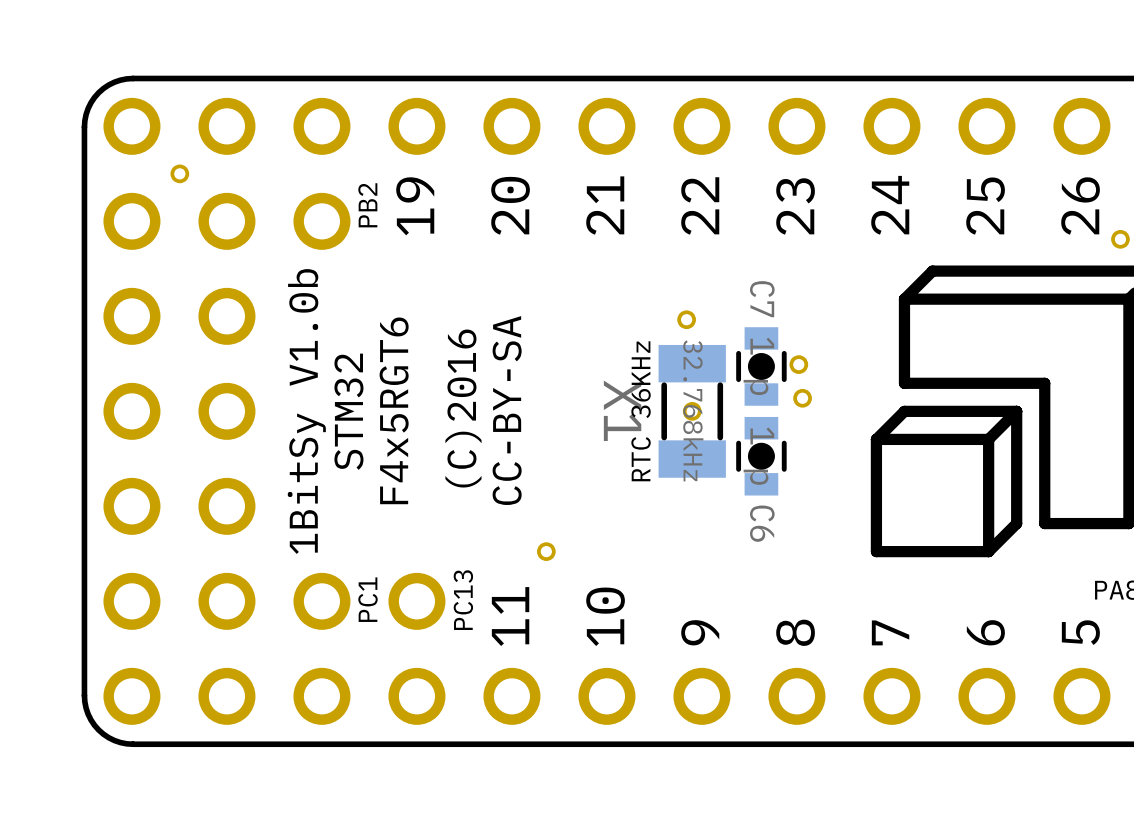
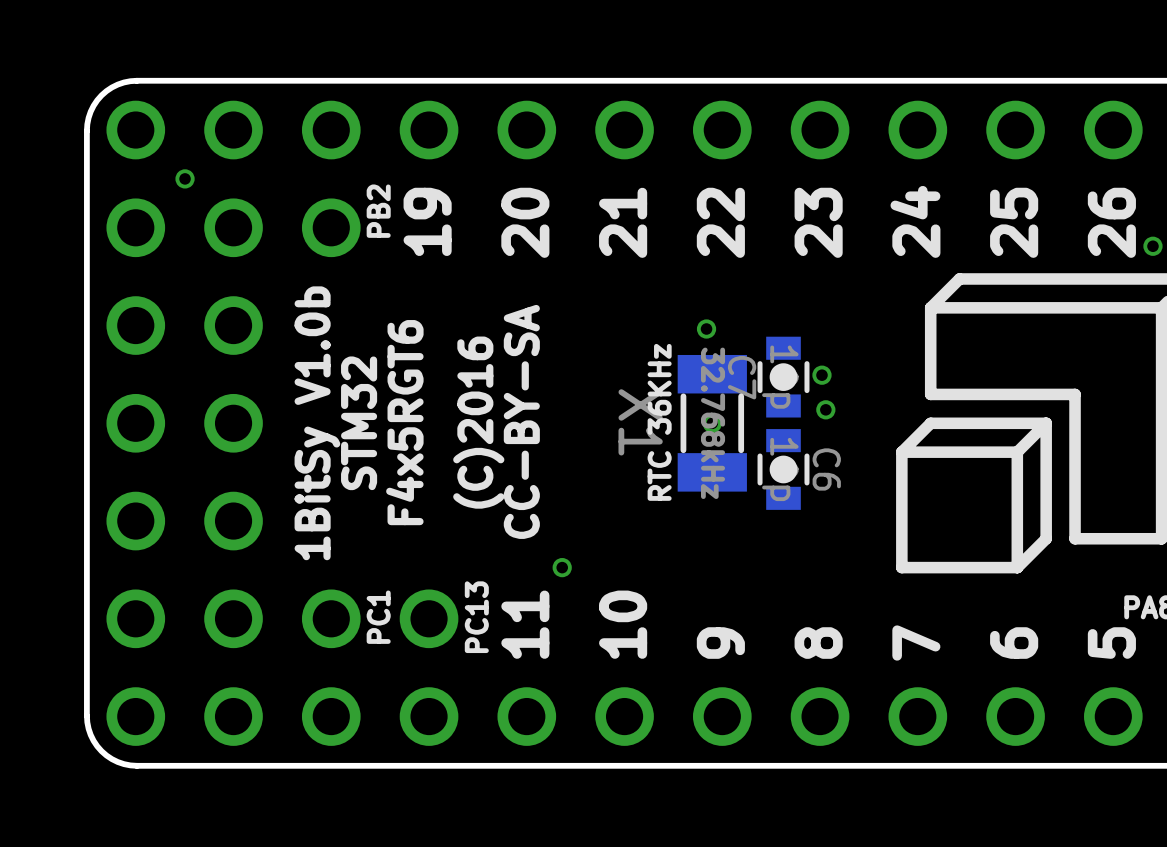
C7 name position: C7 (762, 299) -> C7 (742, 377)
C6 name position: C6 (762, 523) -> C6 (826, 469)

